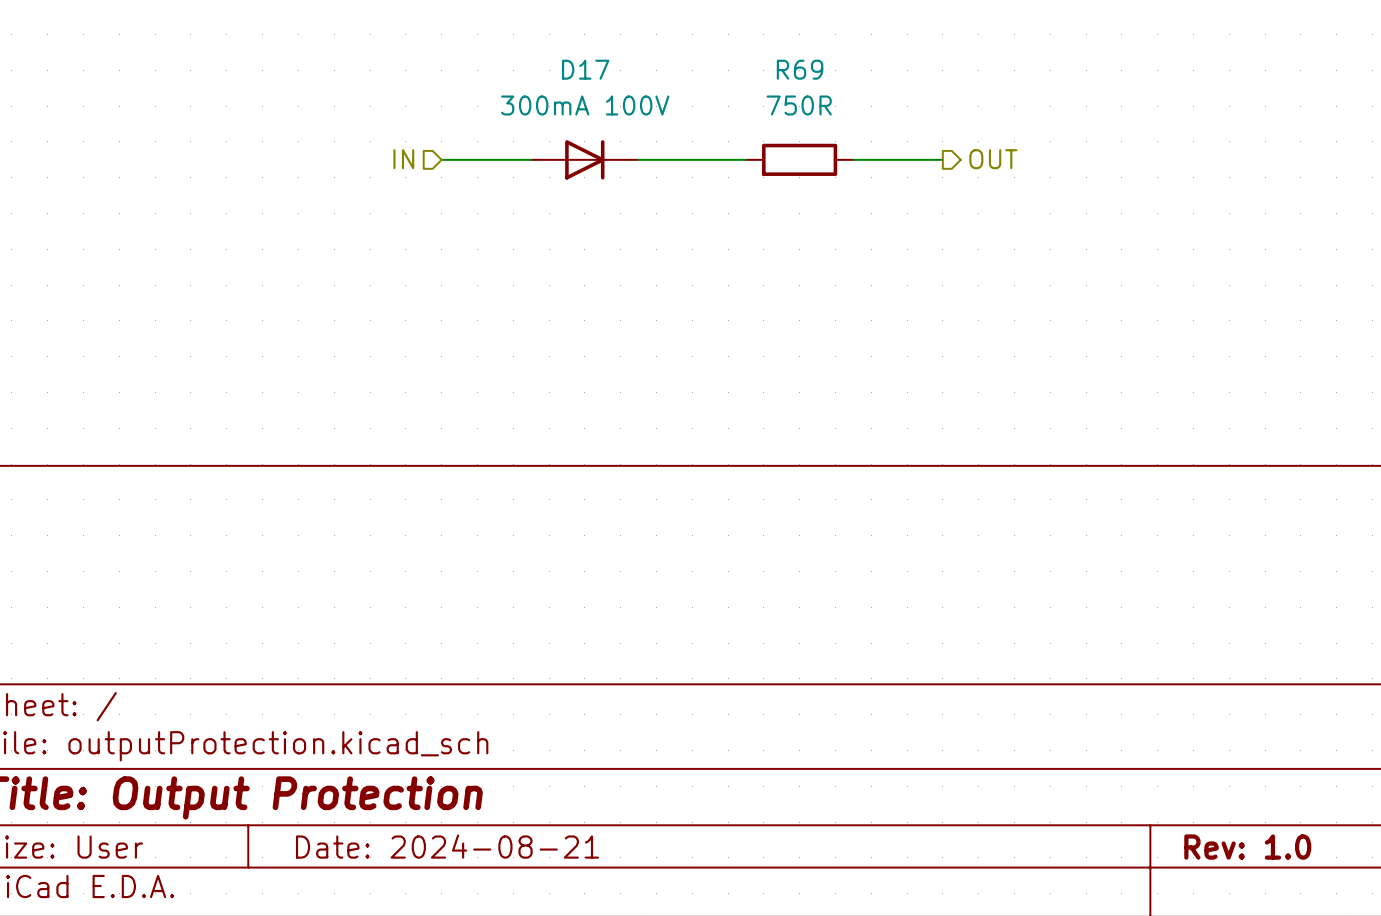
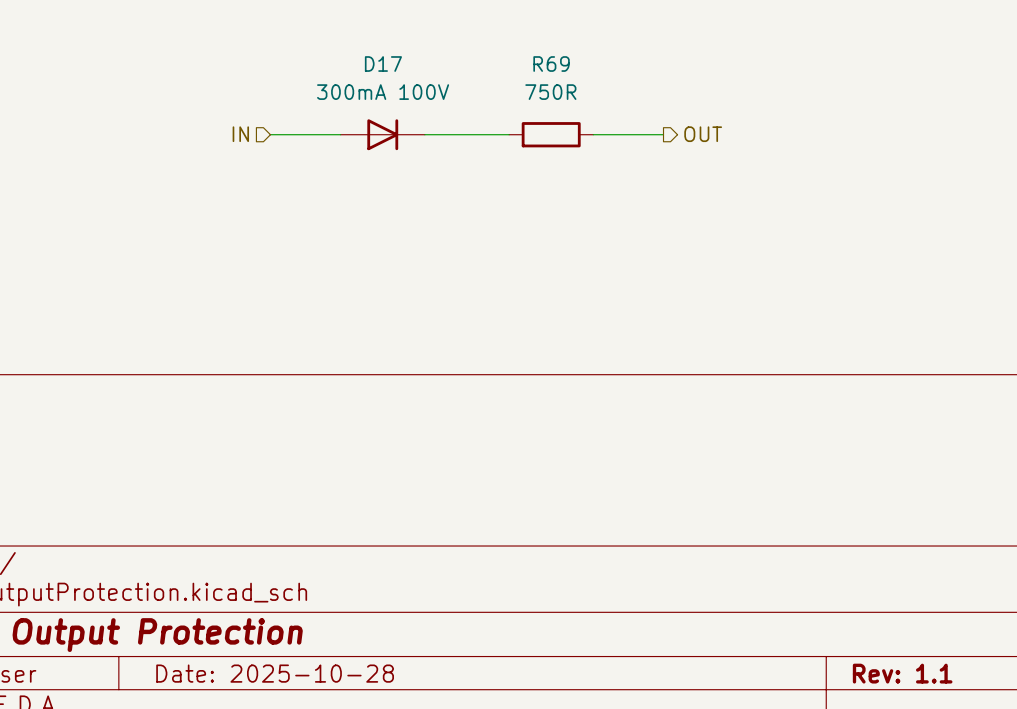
title block: Date: 2024-08-21 (447, 846) -> Date: 2025-10-28 (275, 673)
title block: Rev: 1.0 (1247, 847) -> Rev: 1.1 (902, 673)

